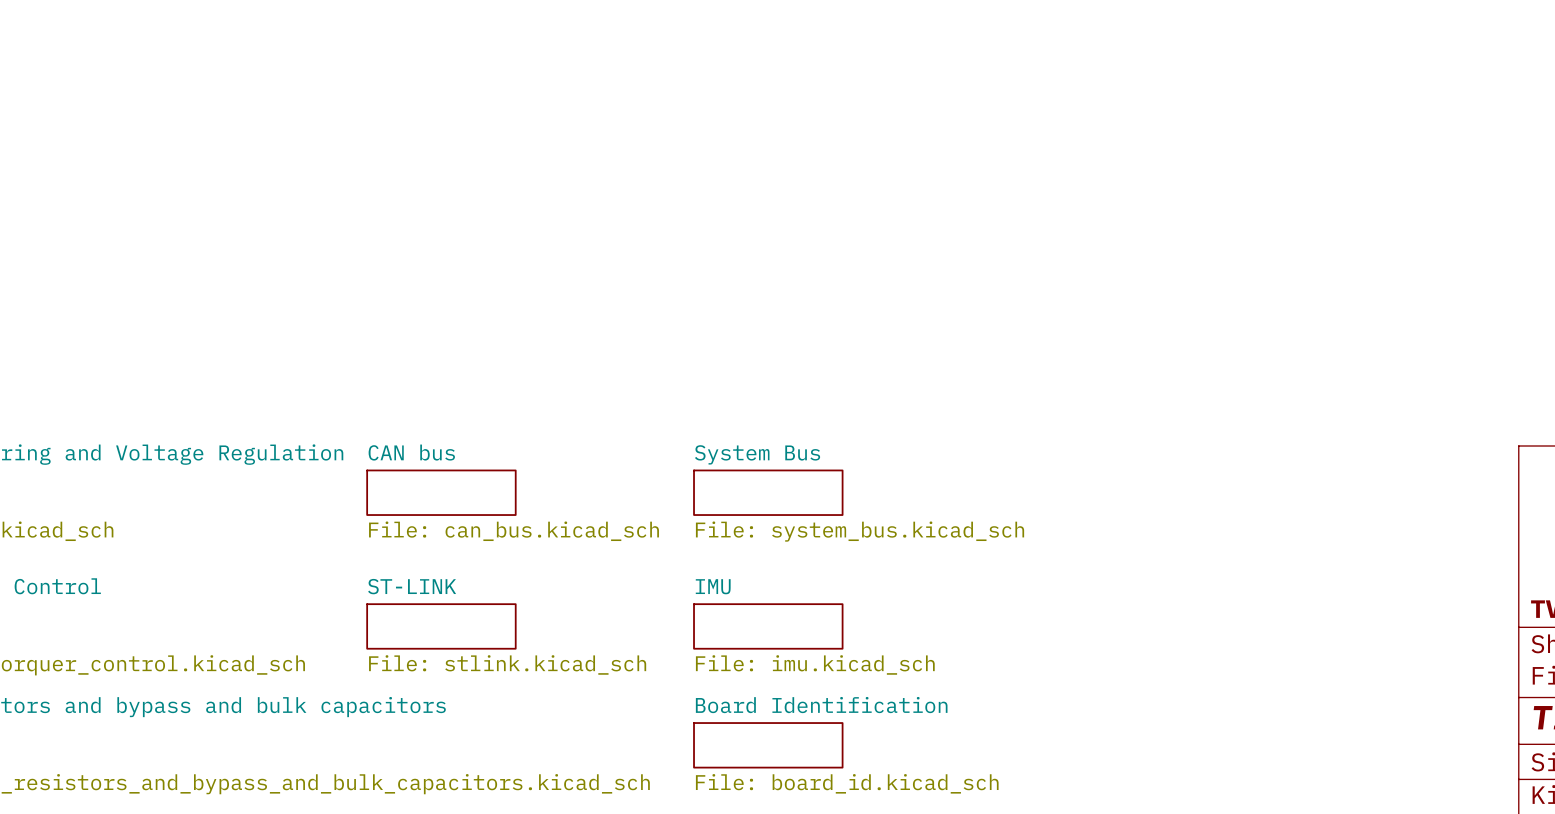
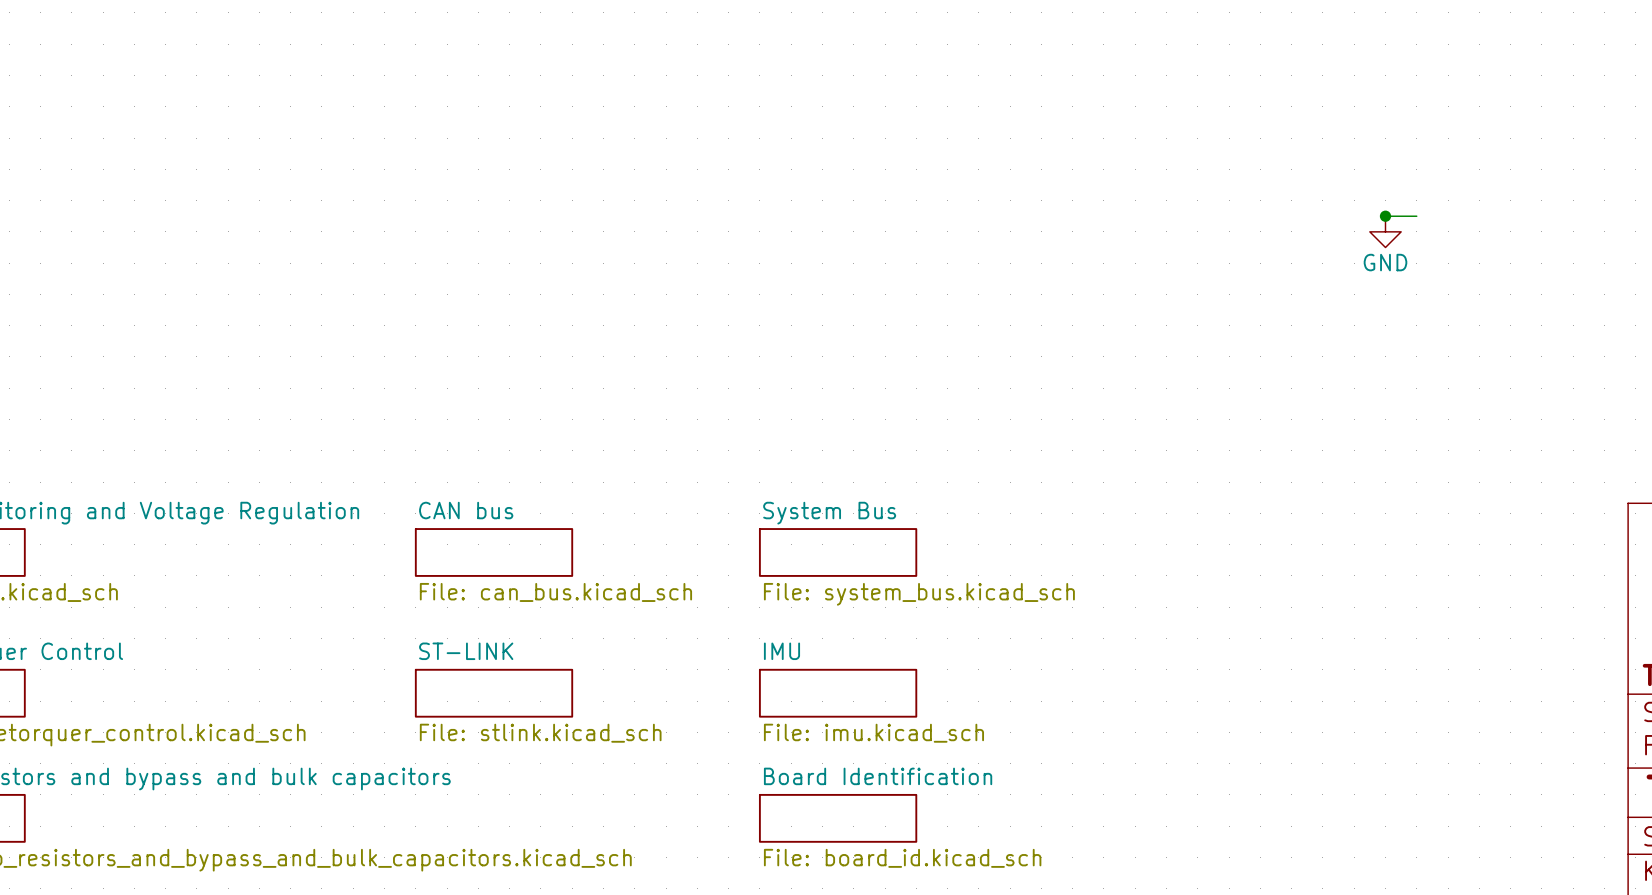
wire: none -> (1385, 216) (1416, 216)
junction: none -> (1385, 216)
power symbol: none -> GND (1385, 231)

